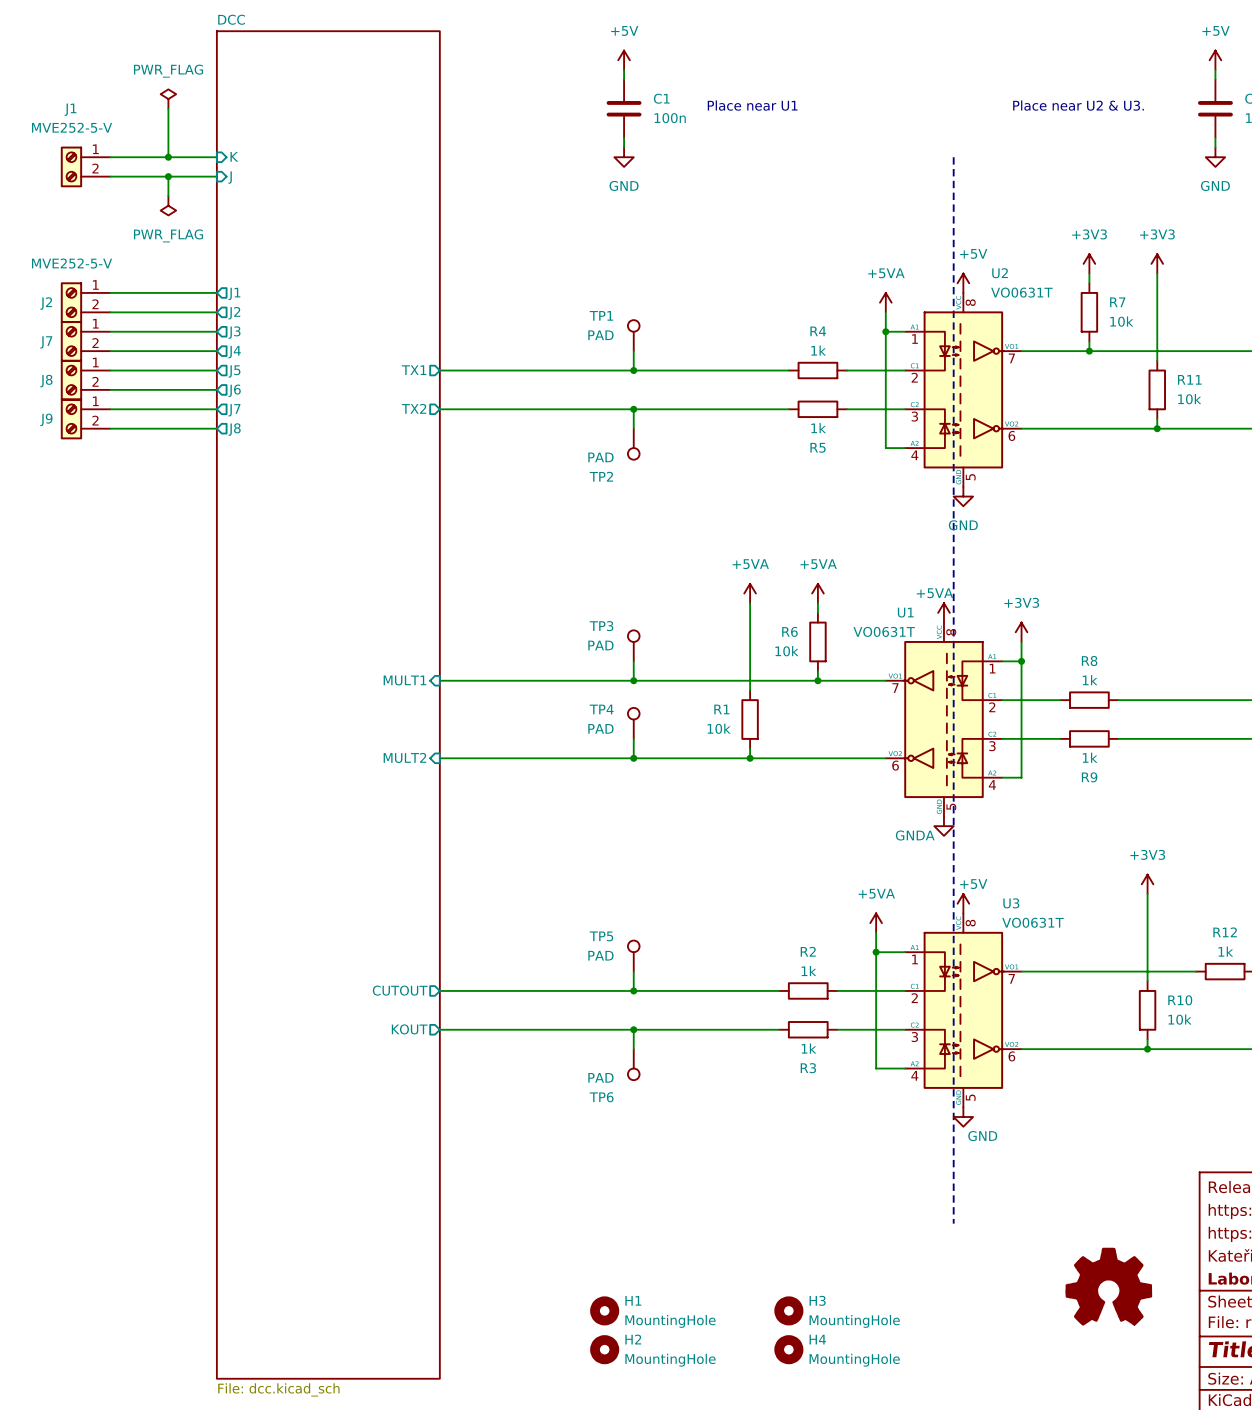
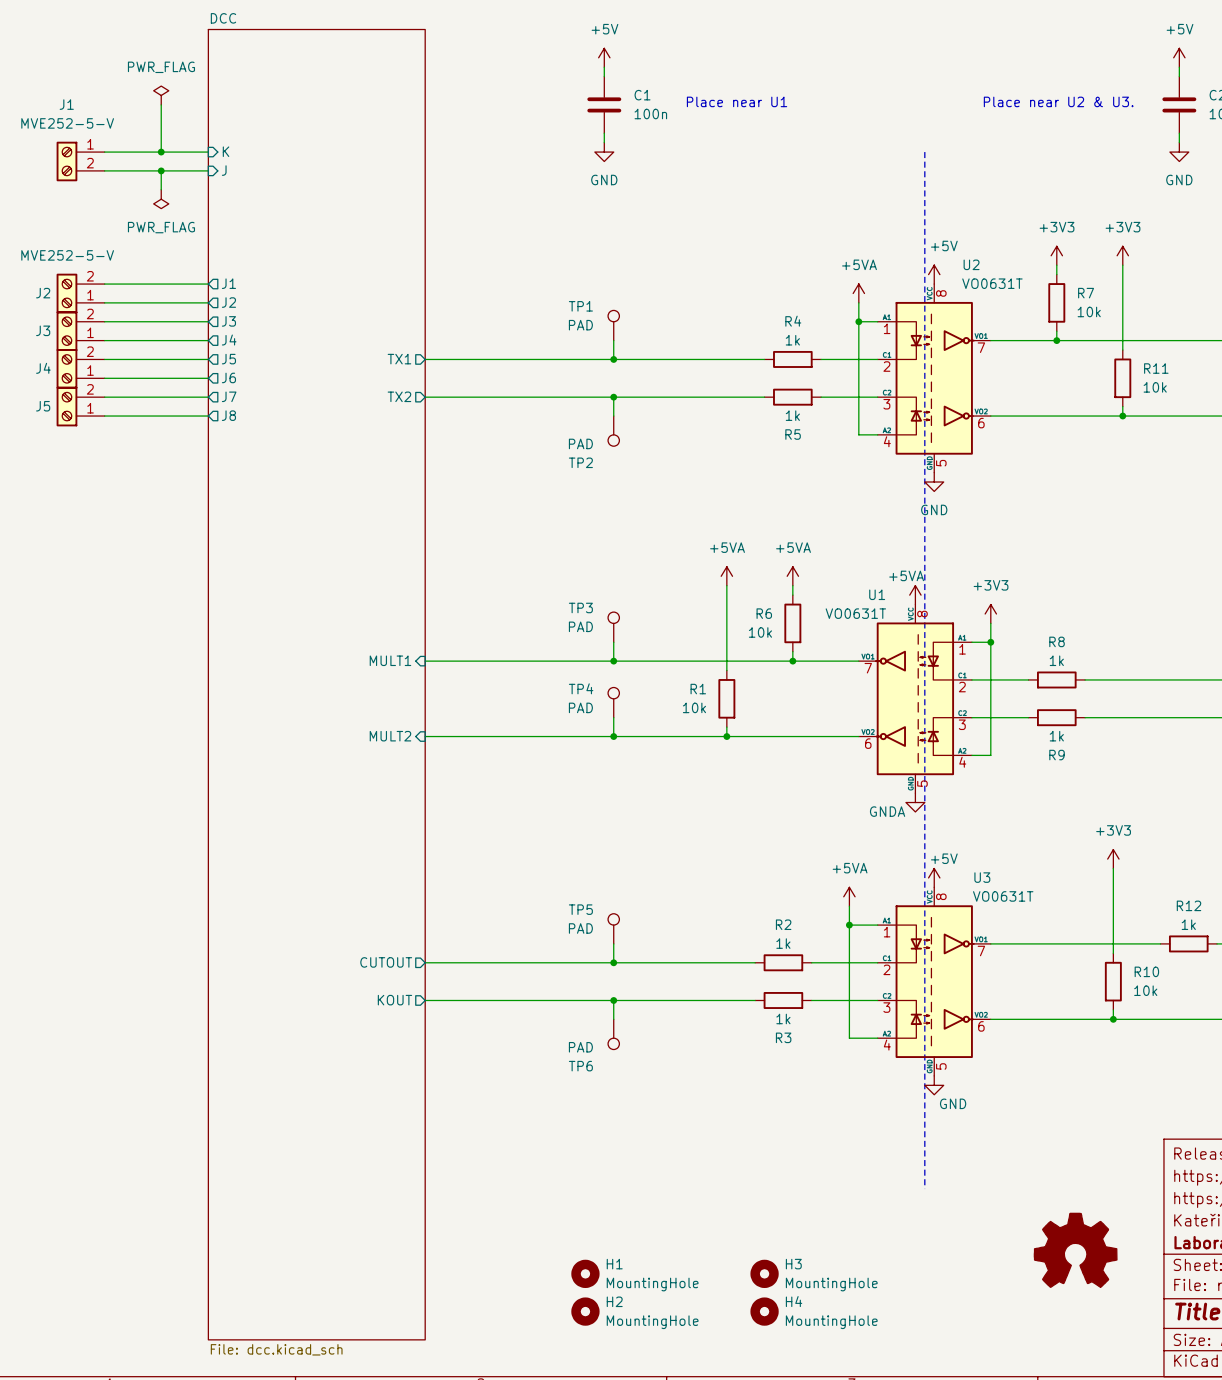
J2 flip: as is (71, 302) -> up-down (66, 293)
J7: (85, 341) -> none
J3: none -> (80, 331)
J8: (85, 380) -> none
J4: none -> (80, 368)
J9: (85, 418) -> none
J5: none -> (80, 406)

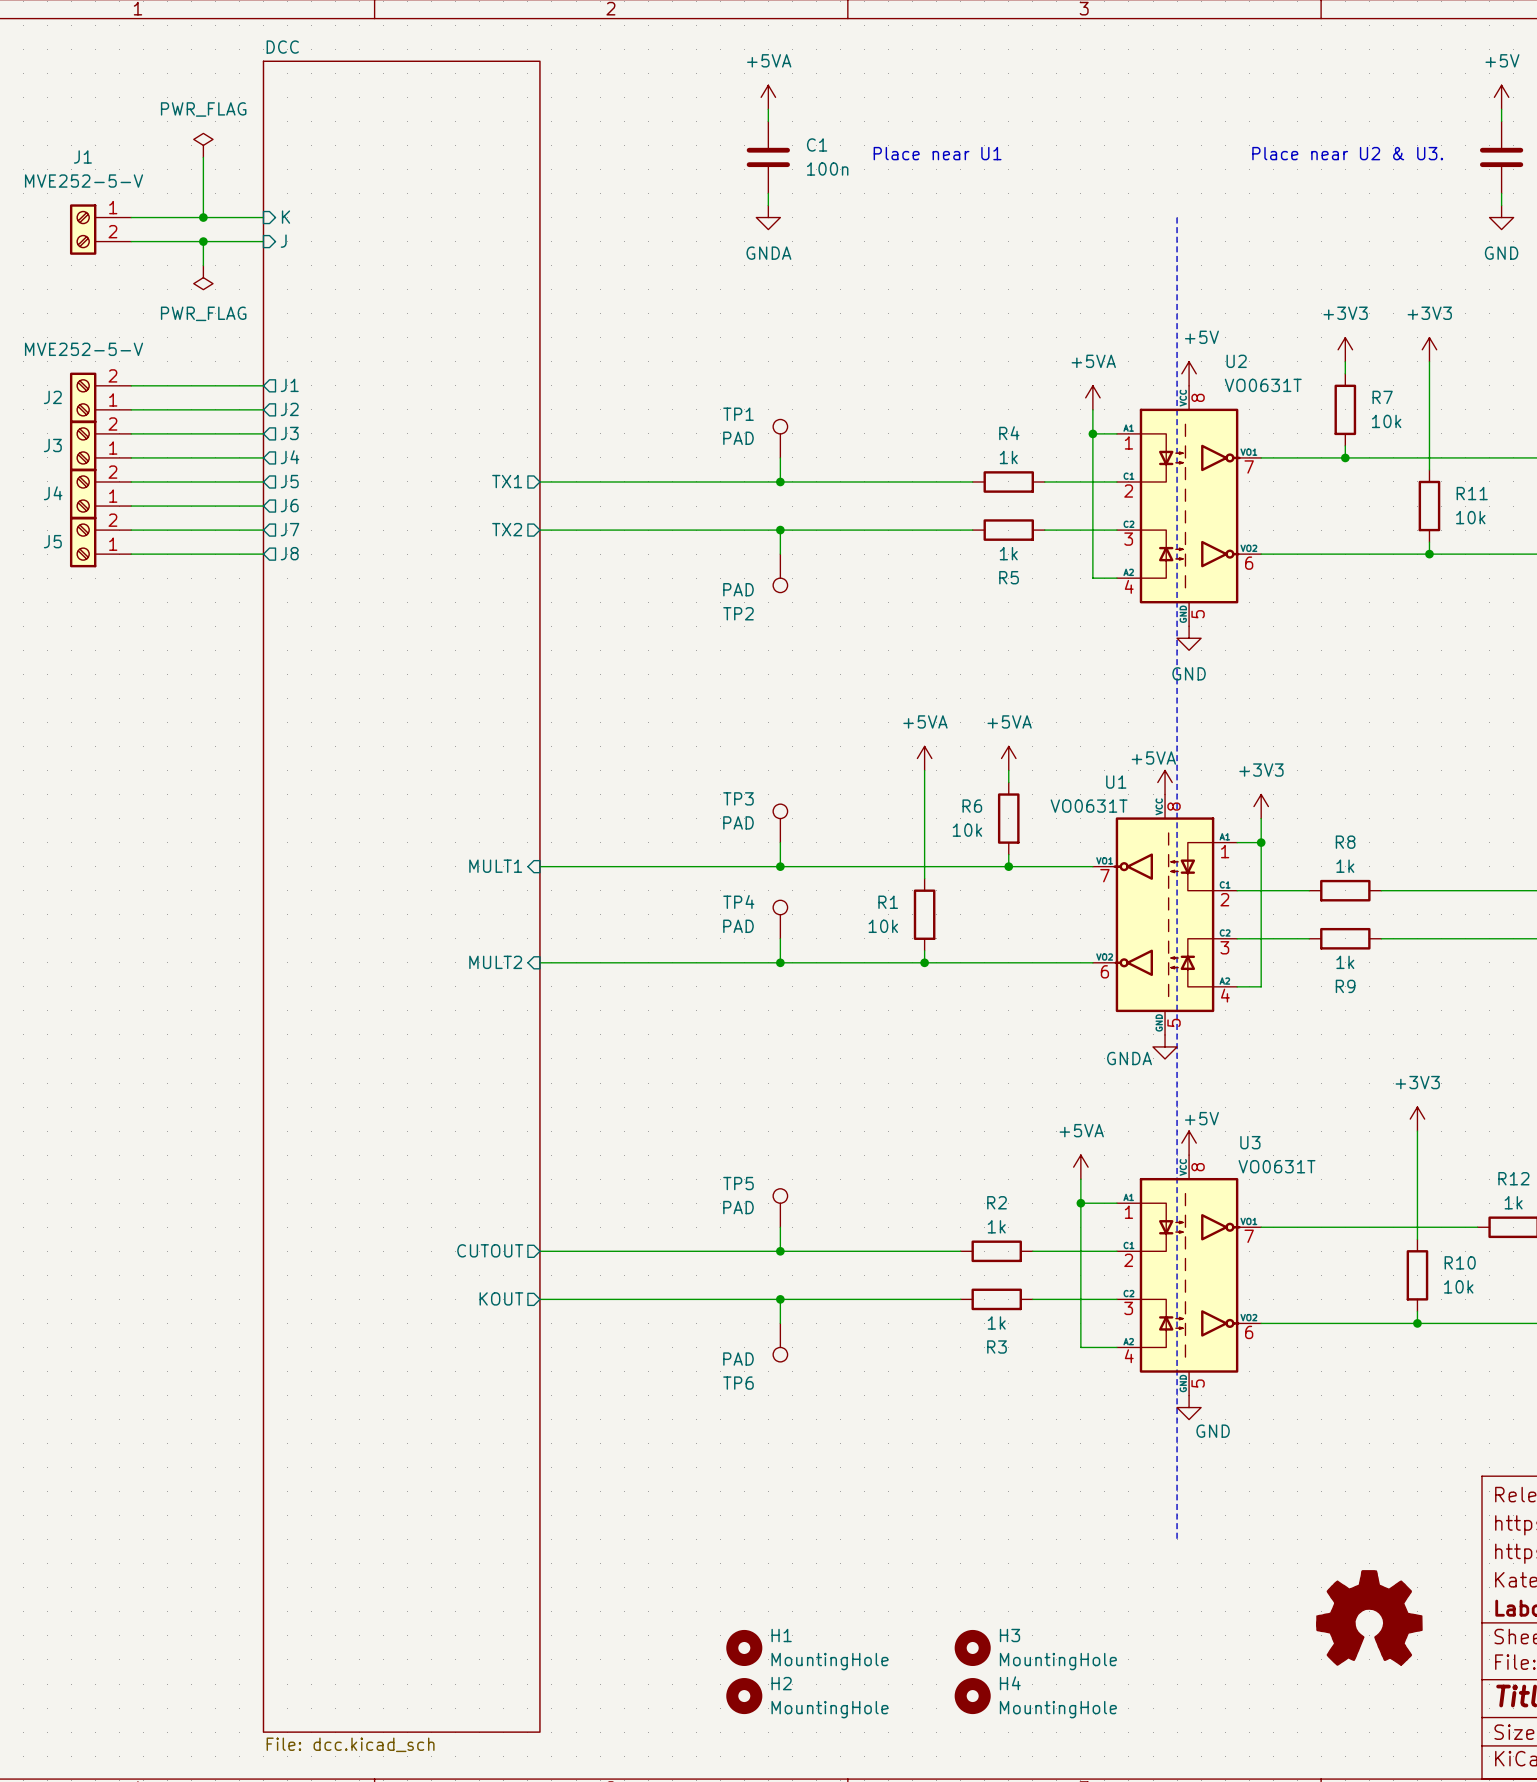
power symbol: +5V (604, 57) -> +5VA (768, 97)
power symbol: GND (604, 152) -> GNDA (768, 217)

